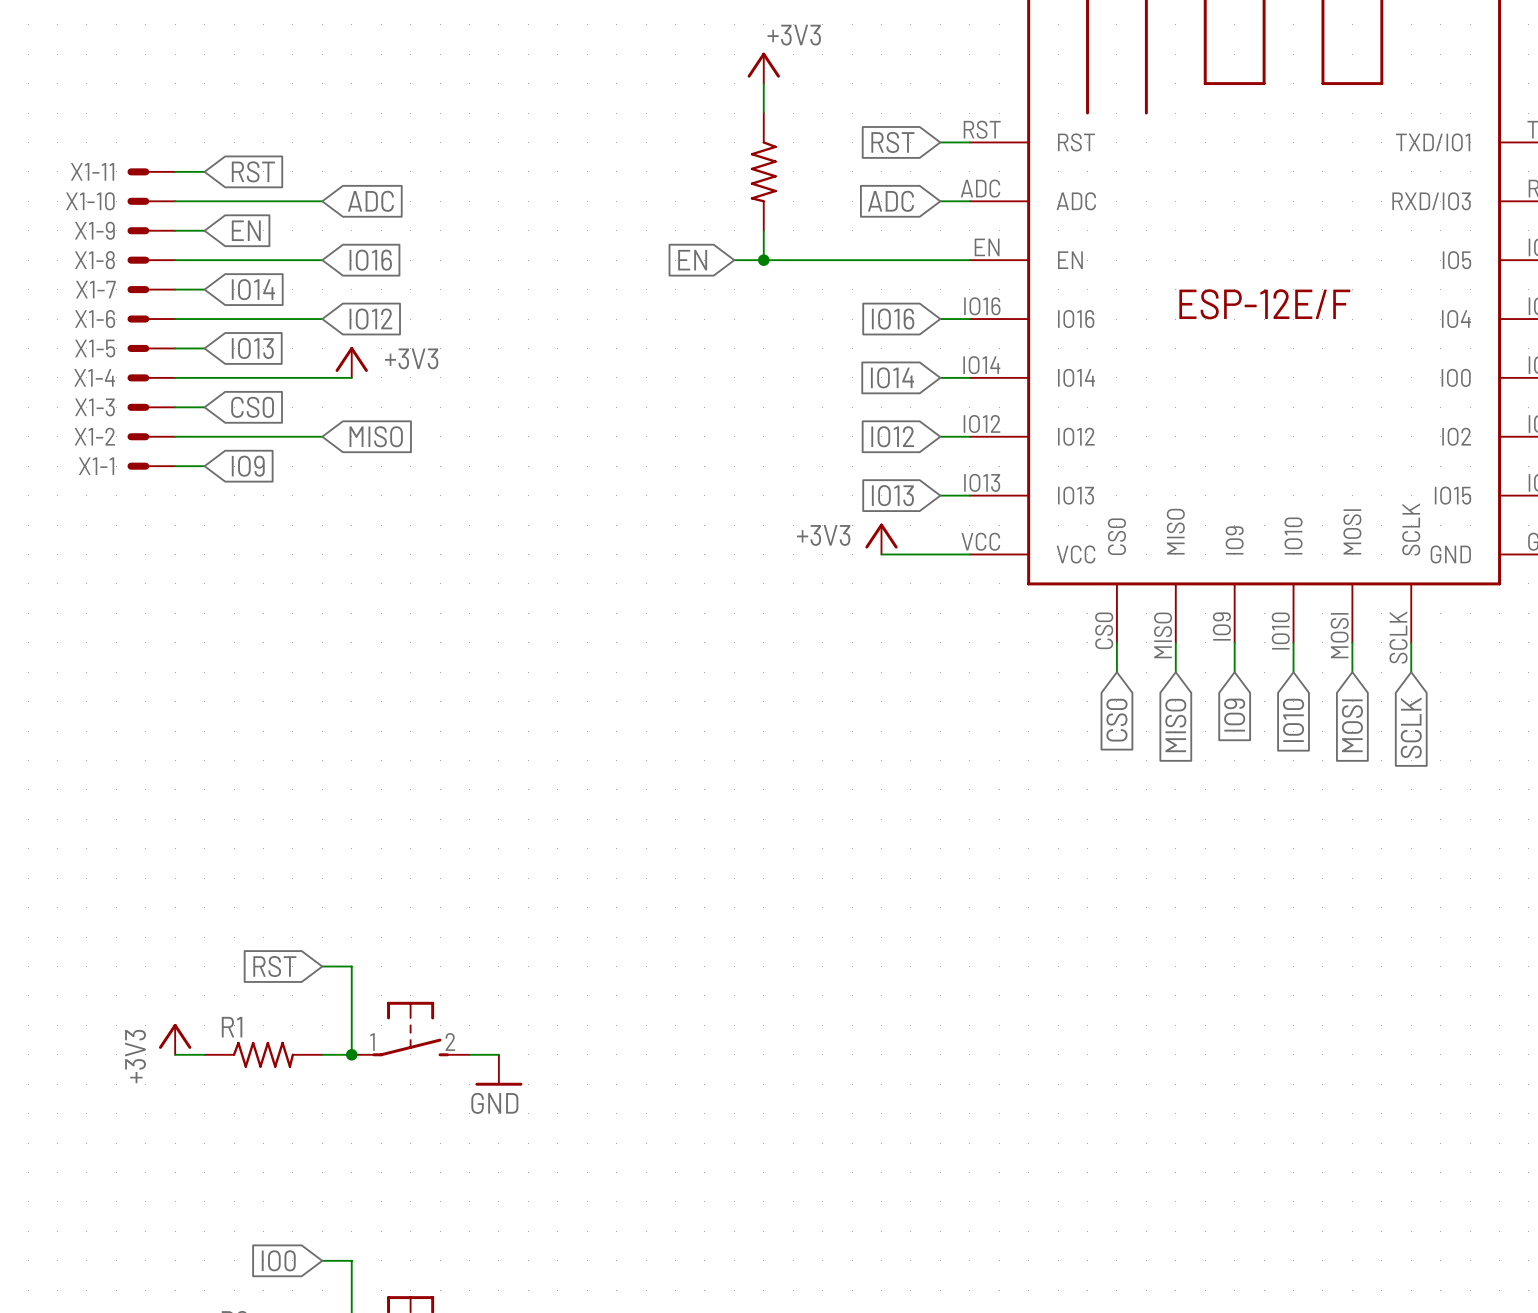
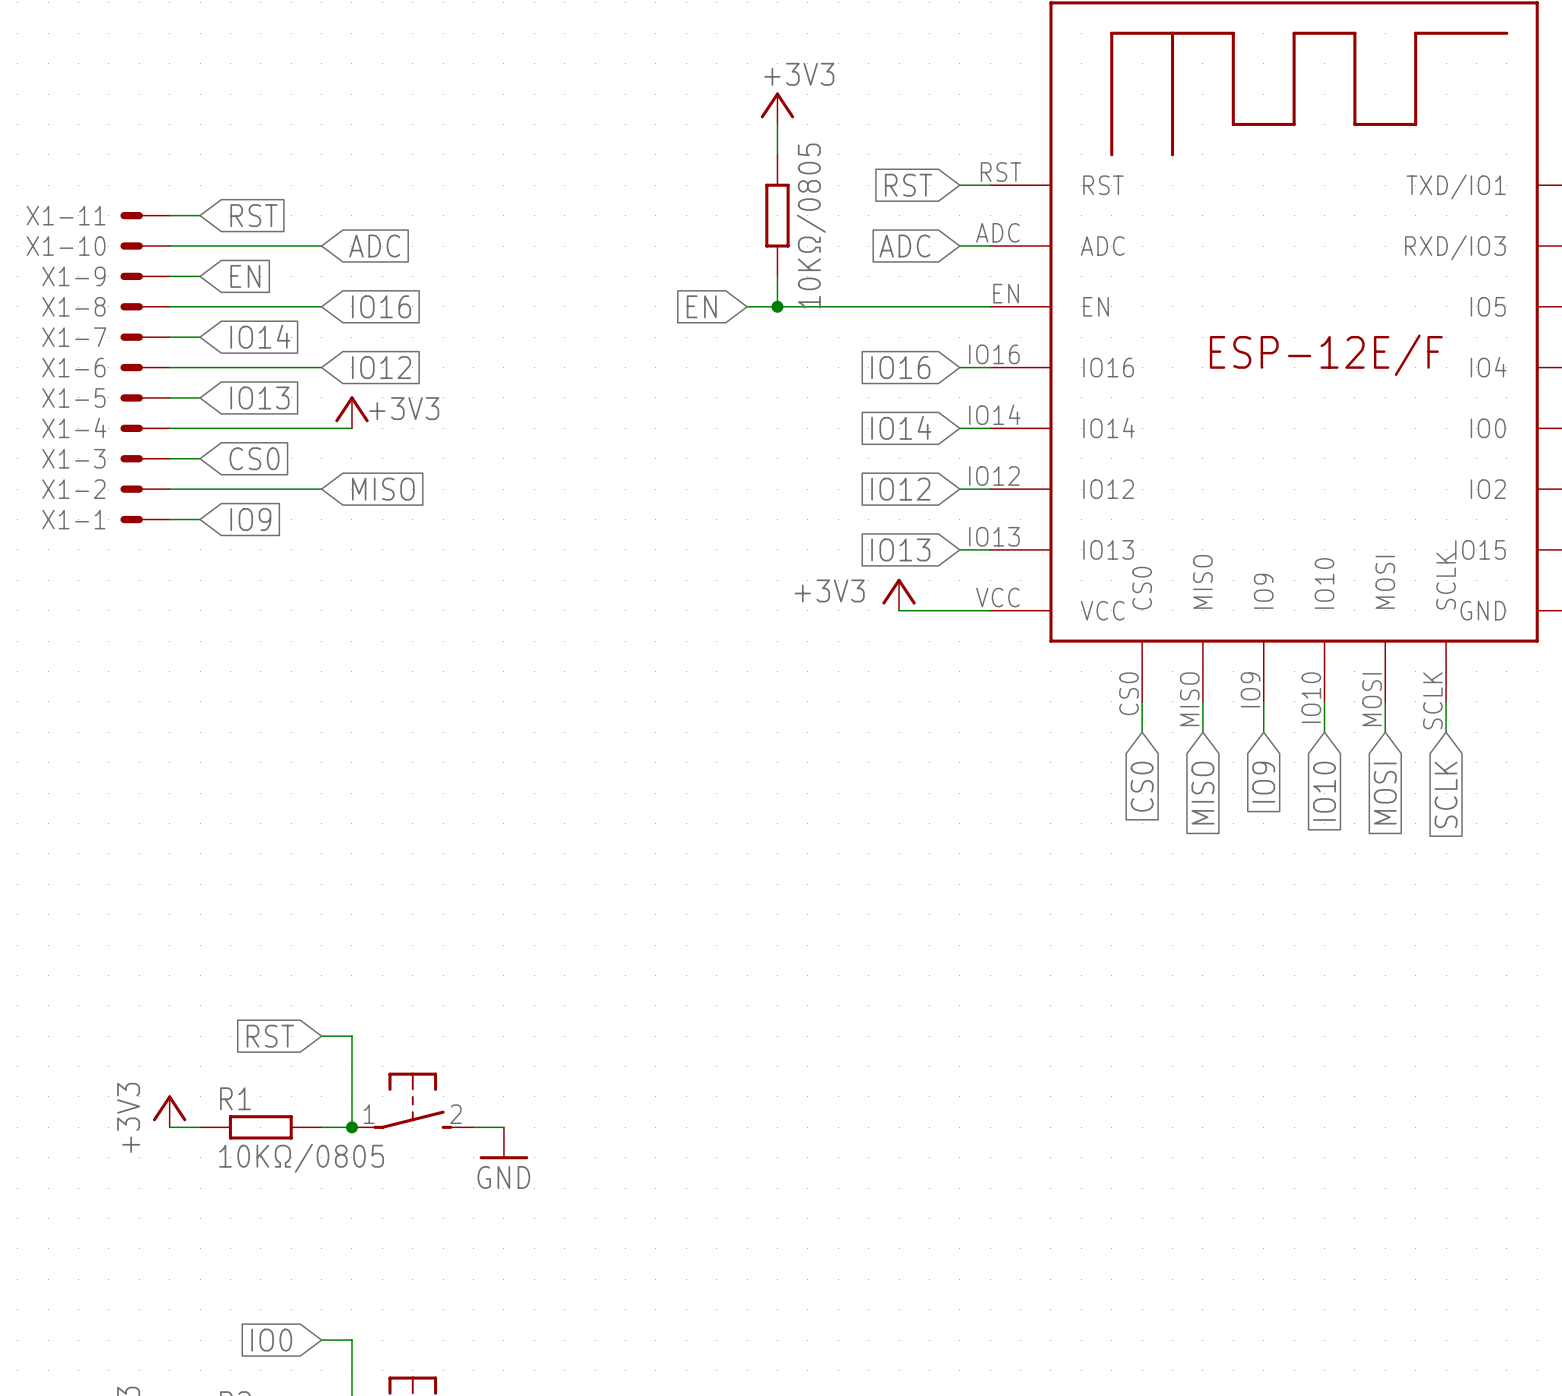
part symbol: [750, 113, 777, 231] -> [765, 154, 790, 277]
part value: none -> 10KΩ/0805 (811, 226)
R1 symbol: [204, 1041, 323, 1068] -> [200, 1115, 322, 1140]
R1 value: none -> 10KΩ/0805 (301, 1158)

